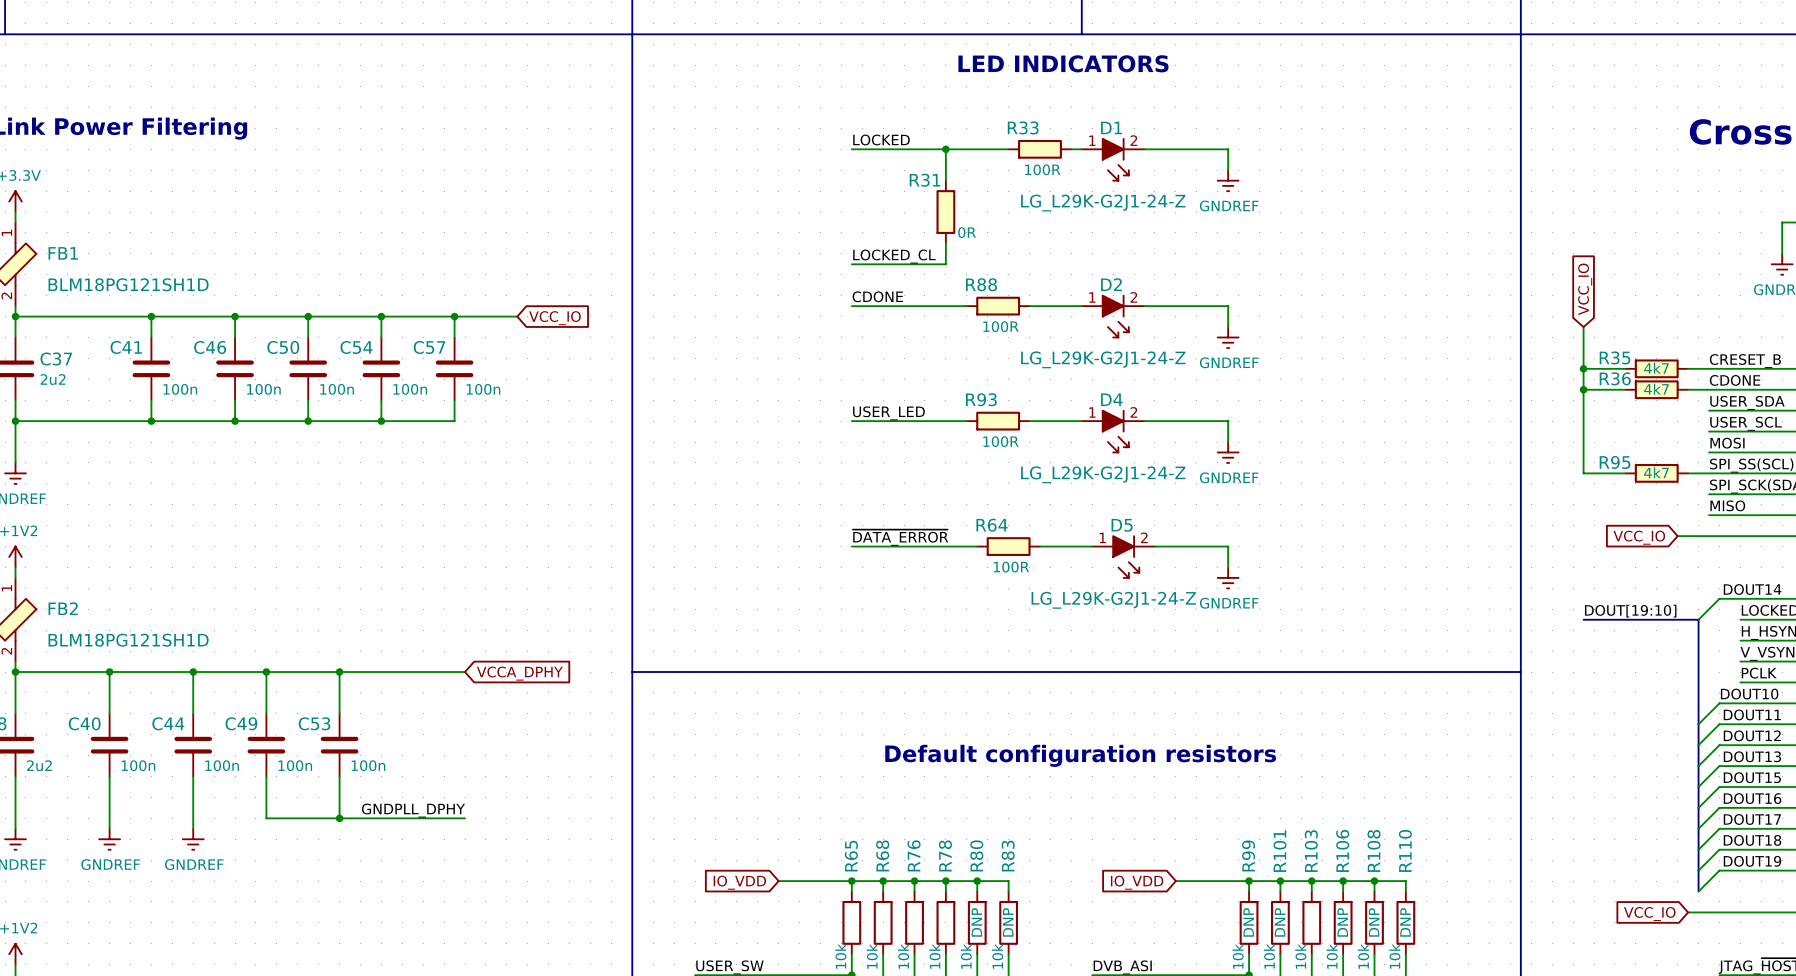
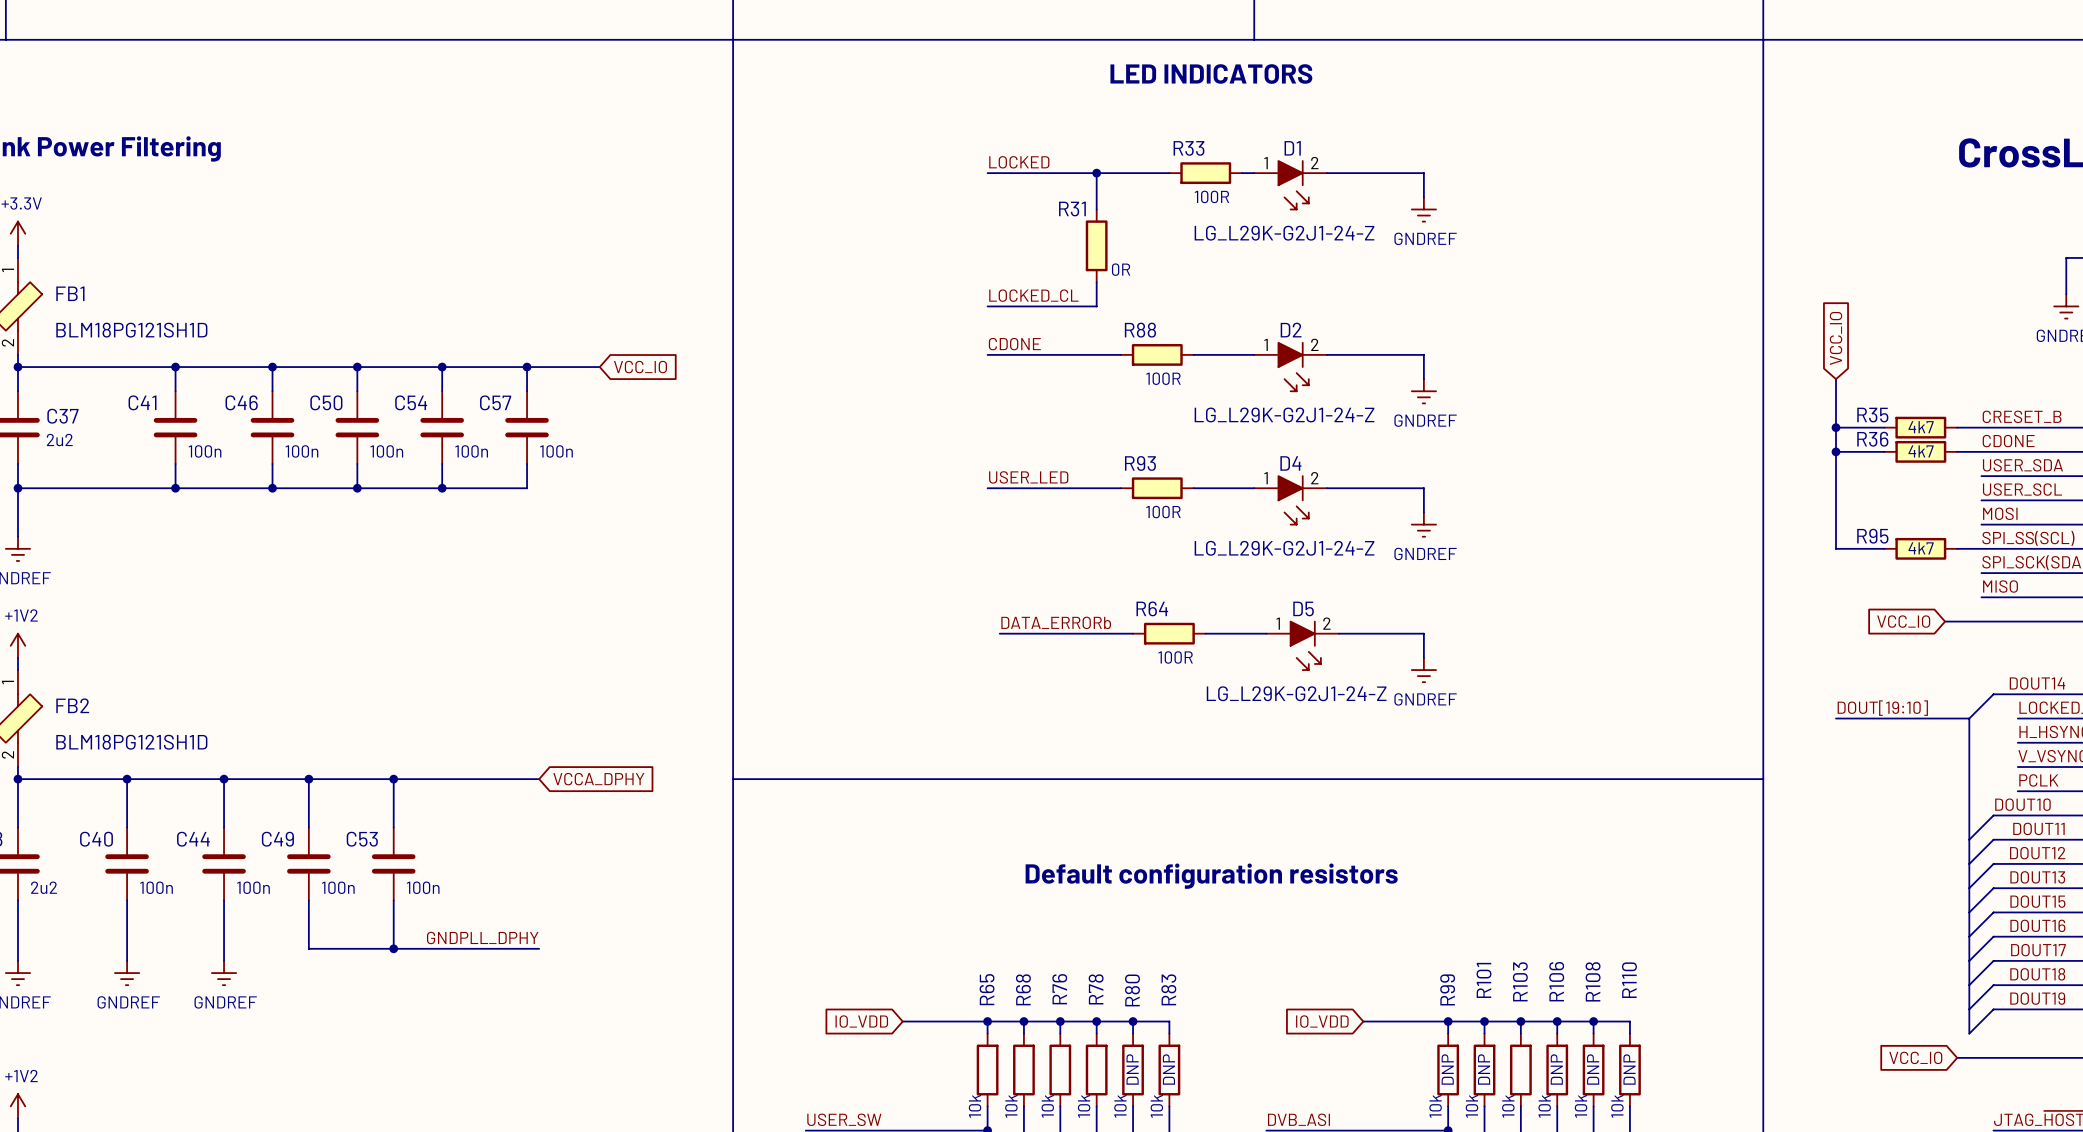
label: ~{DATA_ERROR} (900, 537) -> DATA_ERRORb (1056, 622)
wire: (851, 546) (862, 546) -> none

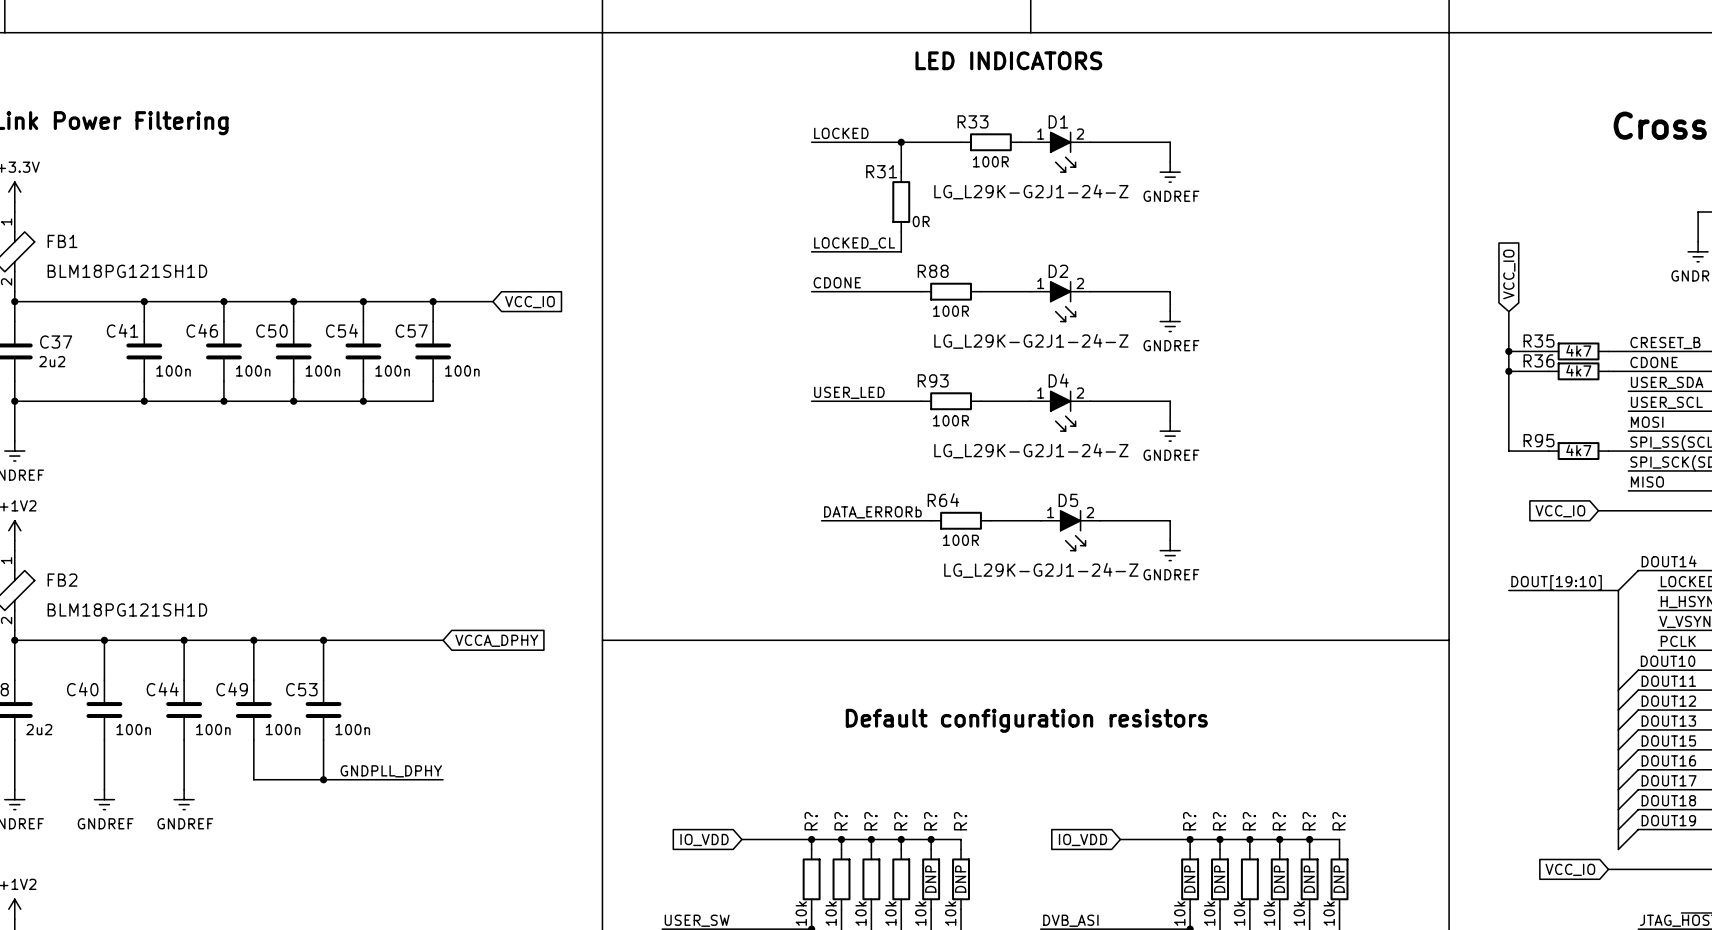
R101 name: R101 (1483, 980) -> R? (1219, 821)
R110 name: R110 (1629, 980) -> R? (1339, 821)
R103 name: R103 (1520, 981) -> R? (1249, 821)
R106 name: R106 (1556, 981) -> R? (1279, 821)
R108 name: R108 (1593, 981) -> R? (1309, 821)
R65 name: R65 (987, 989) -> R? (811, 821)
R68 name: R68 (1023, 989) -> R? (841, 821)
R76 name: R76 (1059, 989) -> R? (870, 821)
R78 name: R78 (1096, 989) -> R? (900, 821)
R83 name: R83 (1168, 989) -> R? (960, 821)
R99 name: R99 (1447, 989) -> R? (1189, 821)
R80 name: R80 (1132, 990) -> R? (930, 821)

